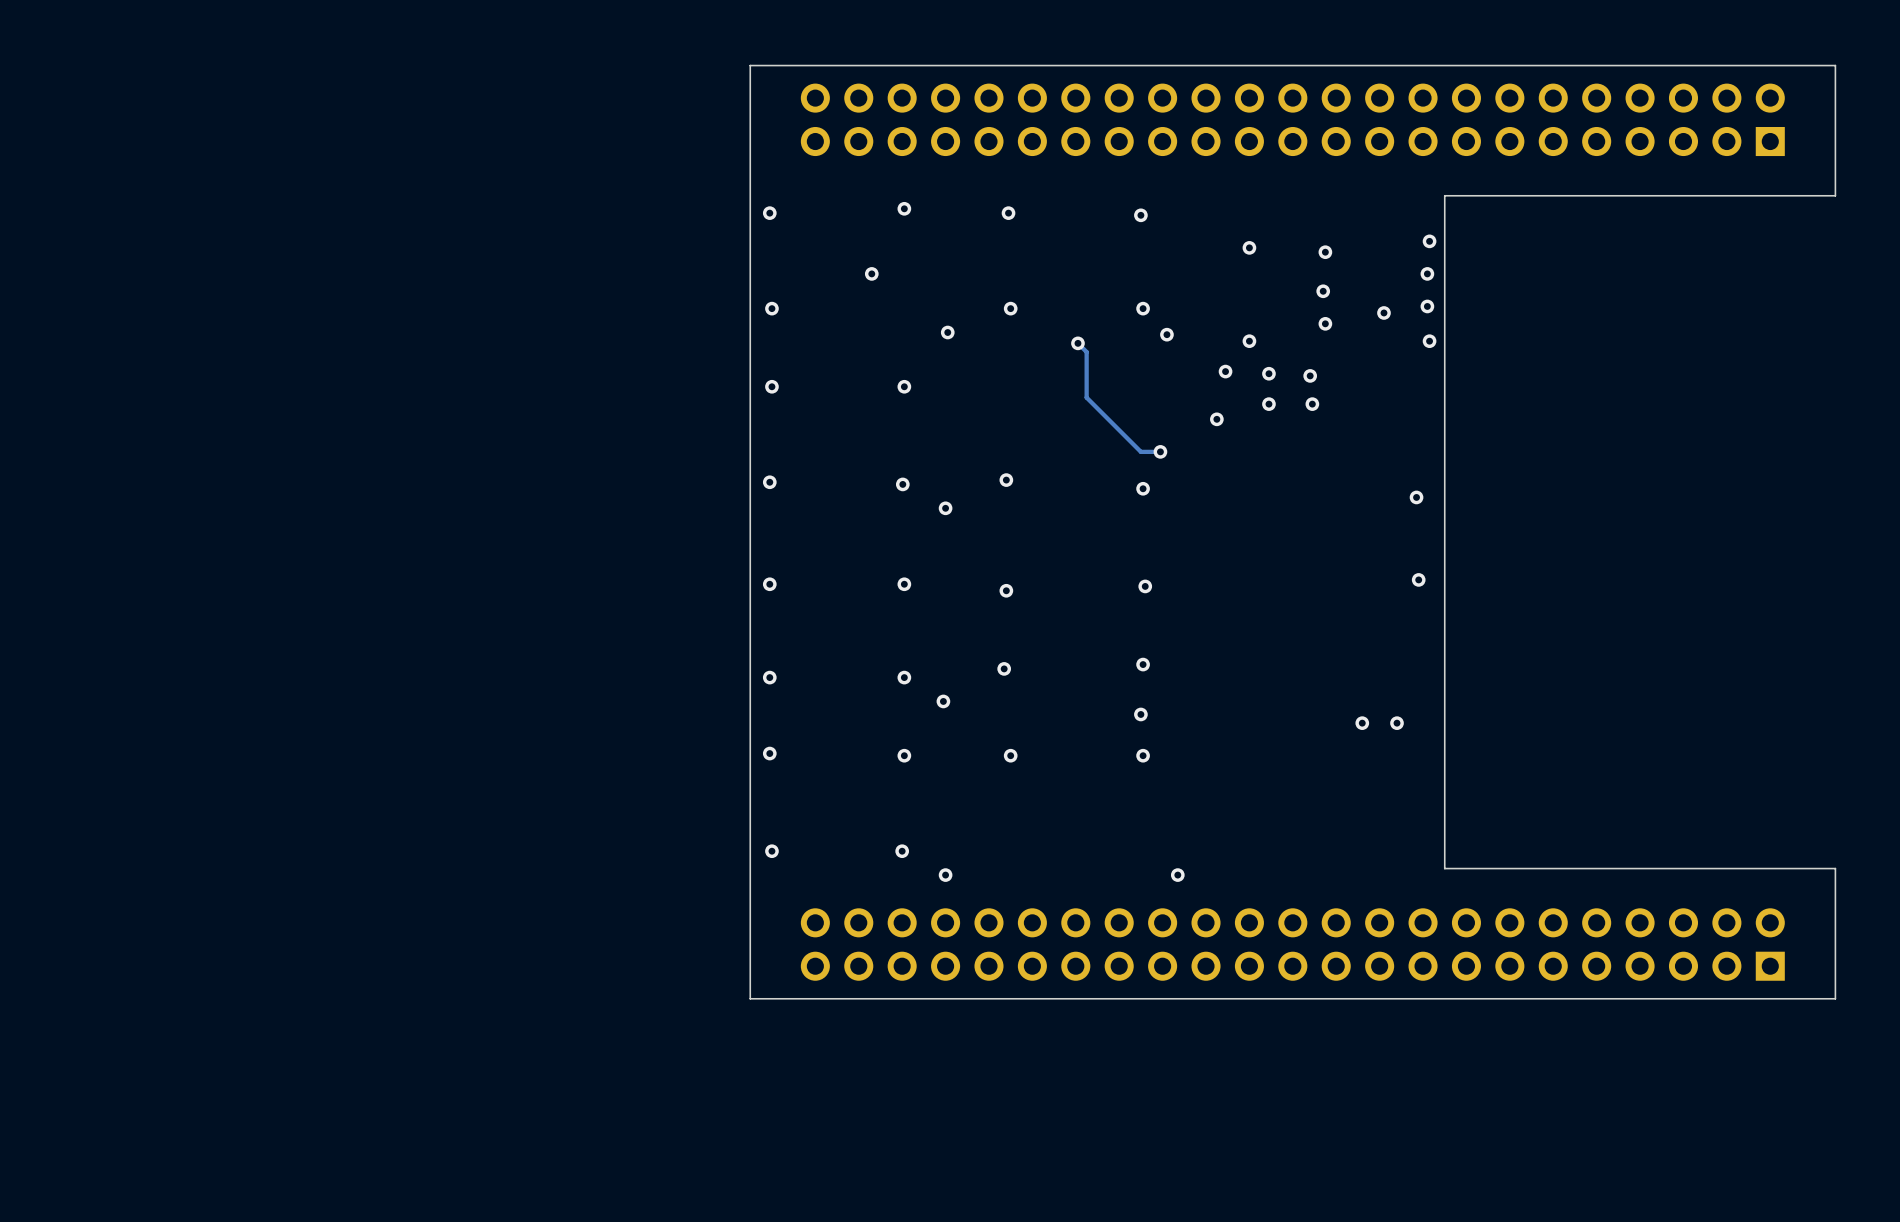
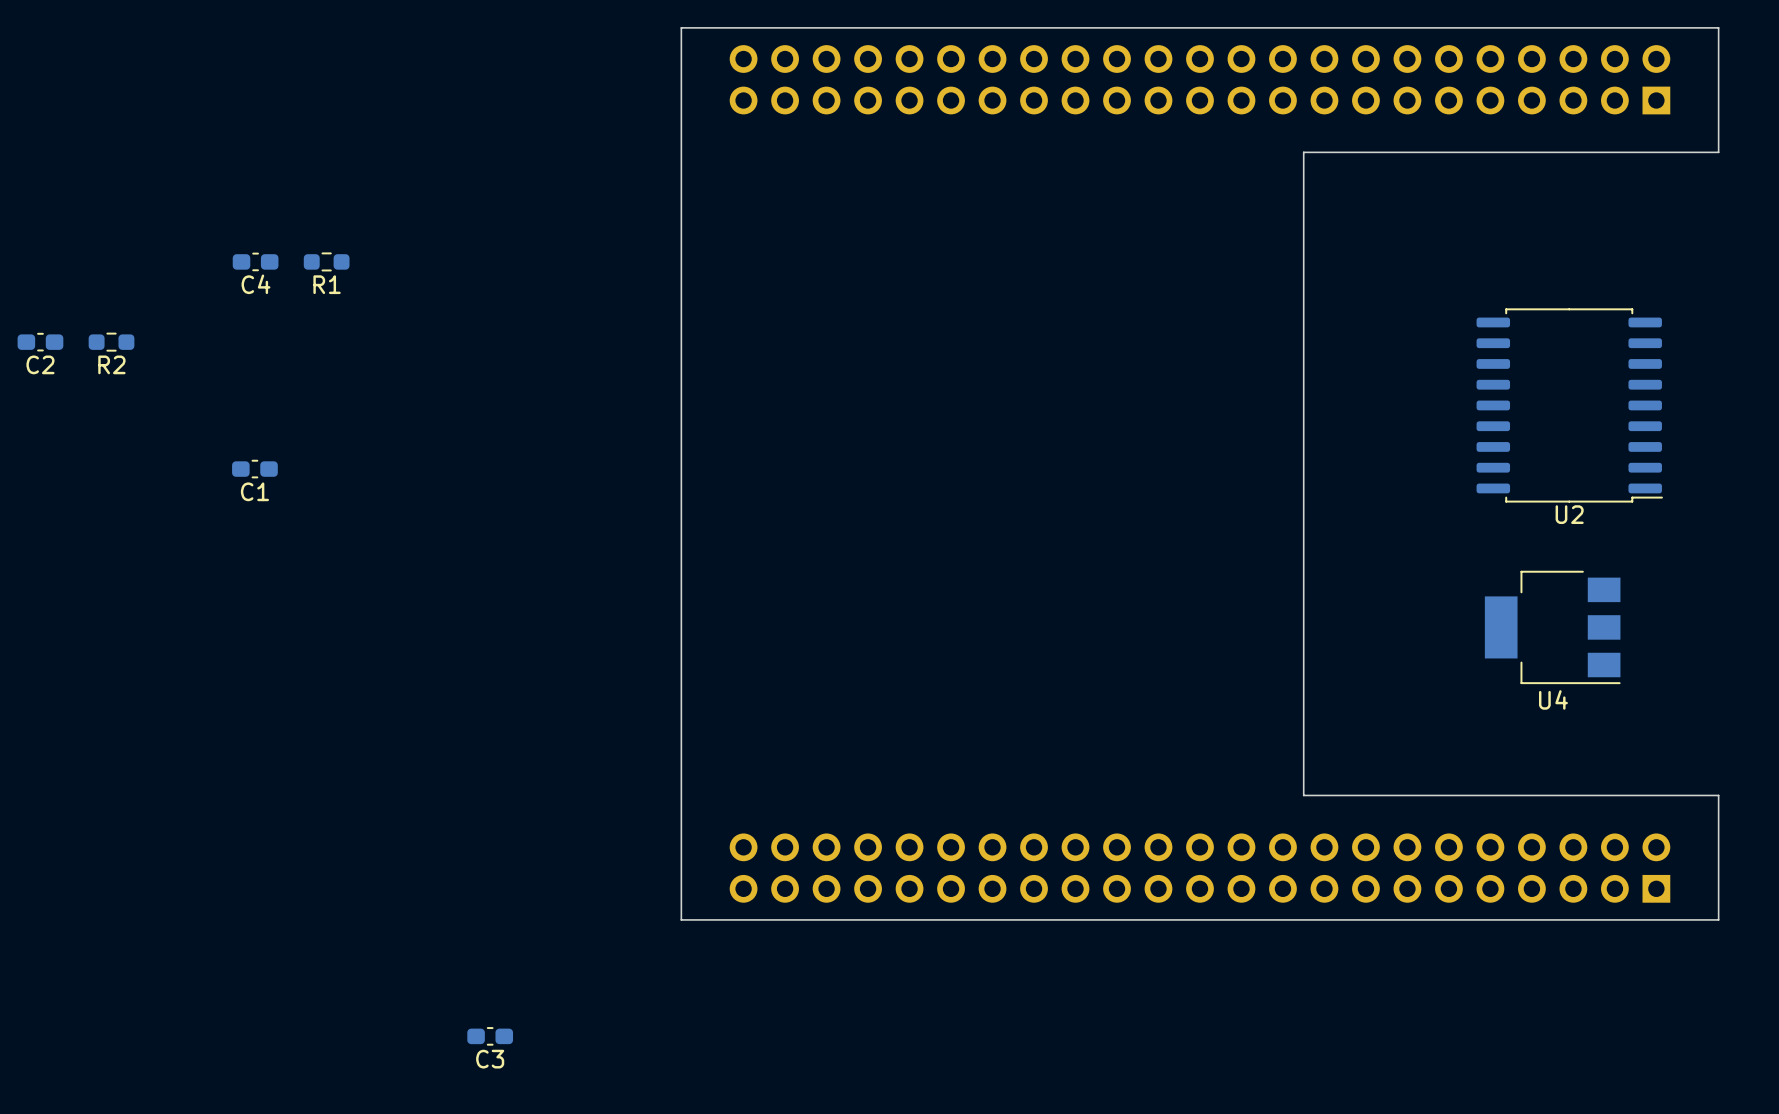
board edge: (1444, 195) (1444, 868) -> (1345, 152) (1303, 152) (1303, 795) (1345, 795)
via: (904, 208) -> none
via: (769, 213) -> none
via: (1008, 213) -> none
via: (1140, 215) -> none
via: (1429, 241) -> none
via: (1249, 247) -> none
via: (1325, 252) -> none
via: (871, 273) -> none
via: (1427, 273) -> none
via: (1323, 291) -> none
via: (1427, 306) -> none
via: (771, 308) -> none
via: (1010, 308) -> none
via: (1143, 308) -> none
C4: none -> (255, 261)
R1: none -> (326, 261)
via: (1383, 312) -> none
via: (1325, 323) -> none
via: (947, 332) -> none
via: (1166, 334) -> none
via: (1249, 341) -> none
via: (1429, 341) -> none
track: (1077, 343) (1086, 352) (1086, 397) (1140, 451) (1160, 451) -> none
via: (1077, 343) -> none
via: (1225, 371) -> none
via: (1268, 373) -> none
via: (1310, 375) -> none
via: (771, 386) -> none
via: (904, 386) -> none
C2: none -> (40, 342)
R2: none -> (111, 342)
via: (1268, 404) -> none
via: (1312, 404) -> none
via: (1216, 419) -> none
via: (1160, 451) -> none
U2: none -> (1569, 405)
via: (1006, 480) -> none
via: (769, 482) -> none
via: (902, 484) -> none
via: (1143, 488) -> none
via: (1416, 497) -> none
via: (945, 508) -> none
C1: none -> (254, 469)
via: (1418, 579) -> none
via: (769, 584) -> none
via: (904, 584) -> none
via: (1145, 586) -> none
via: (1006, 590) -> none
via: (1143, 664) -> none
via: (1004, 668) -> none
via: (769, 677) -> none
via: (904, 677) -> none
U4: none -> (1552, 627)
via: (943, 701) -> none
via: (1140, 714) -> none
via: (1362, 723) -> none
via: (1397, 723) -> none
via: (769, 753) -> none
via: (904, 755) -> none
via: (1010, 755) -> none
via: (1143, 755) -> none
via: (771, 851) -> none
via: (902, 851) -> none
via: (945, 875) -> none
via: (1177, 875) -> none
C3: none -> (490, 1036)

